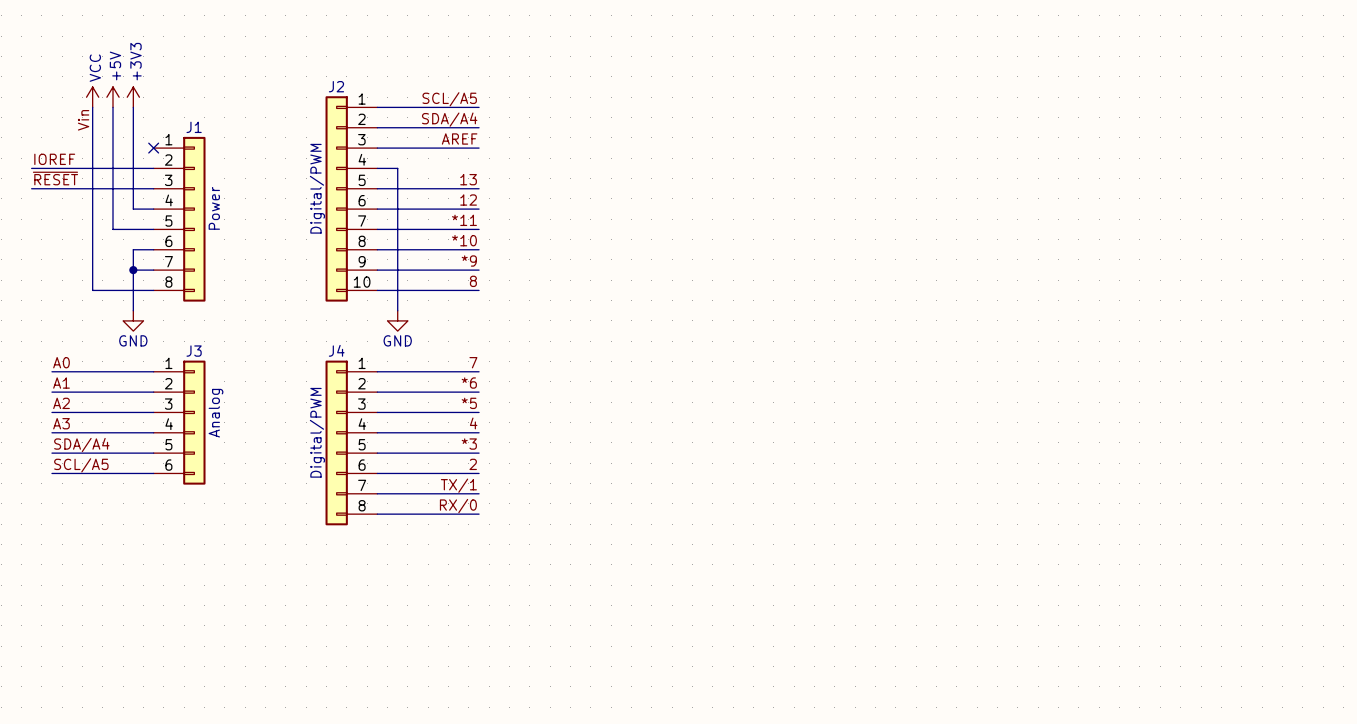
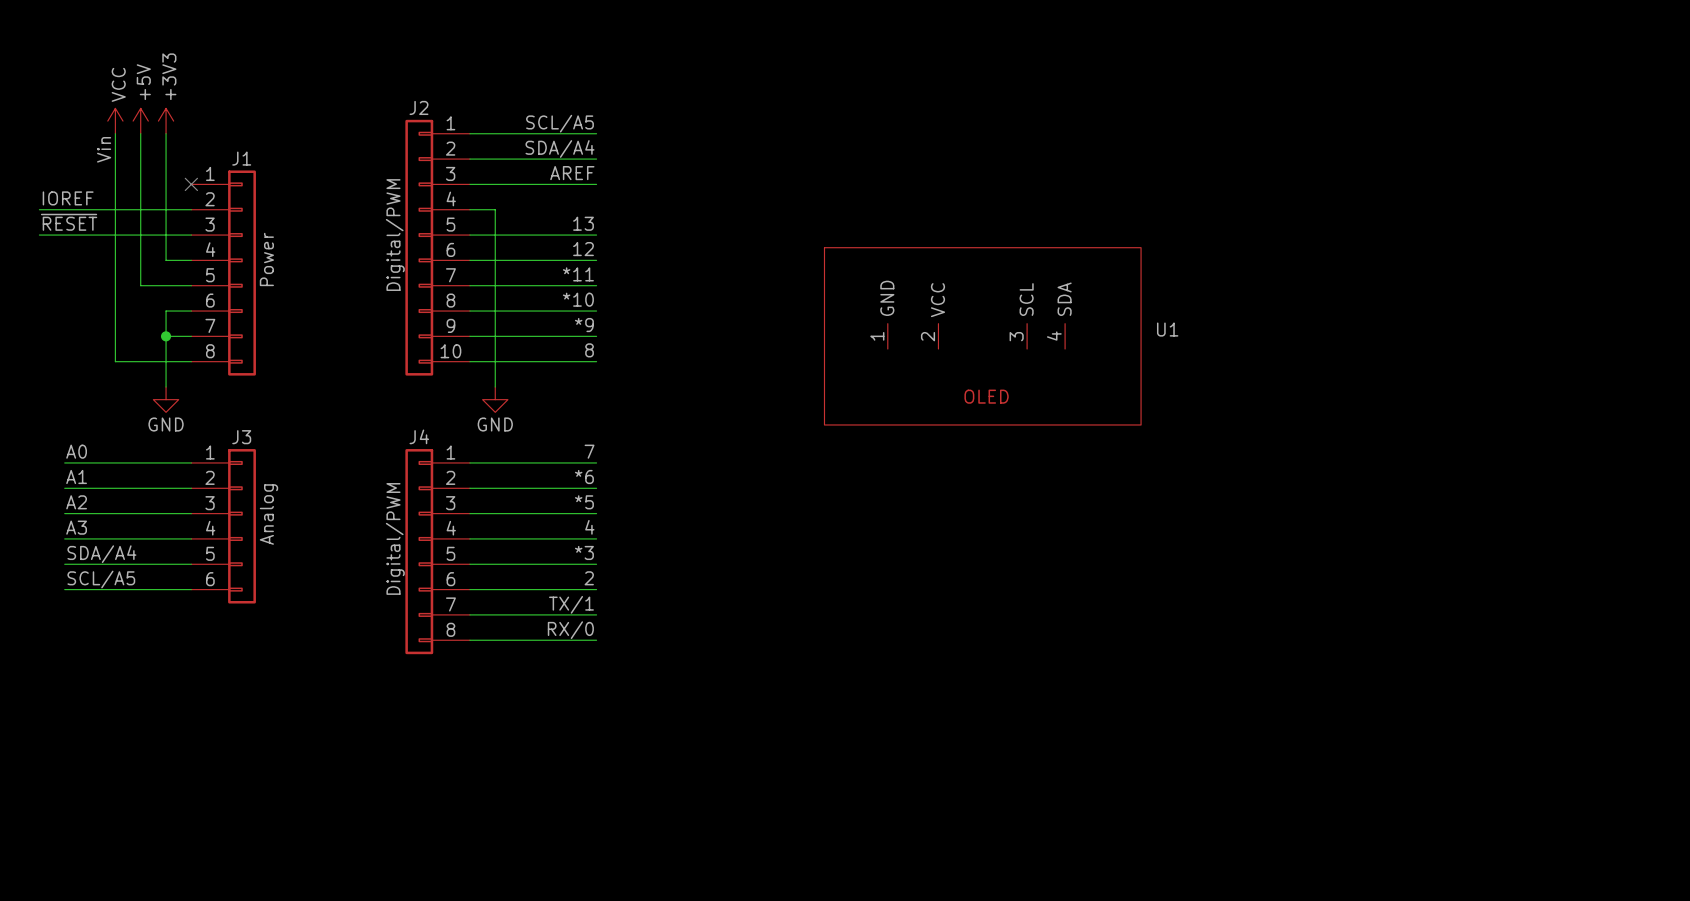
U1: none -> (982, 336)

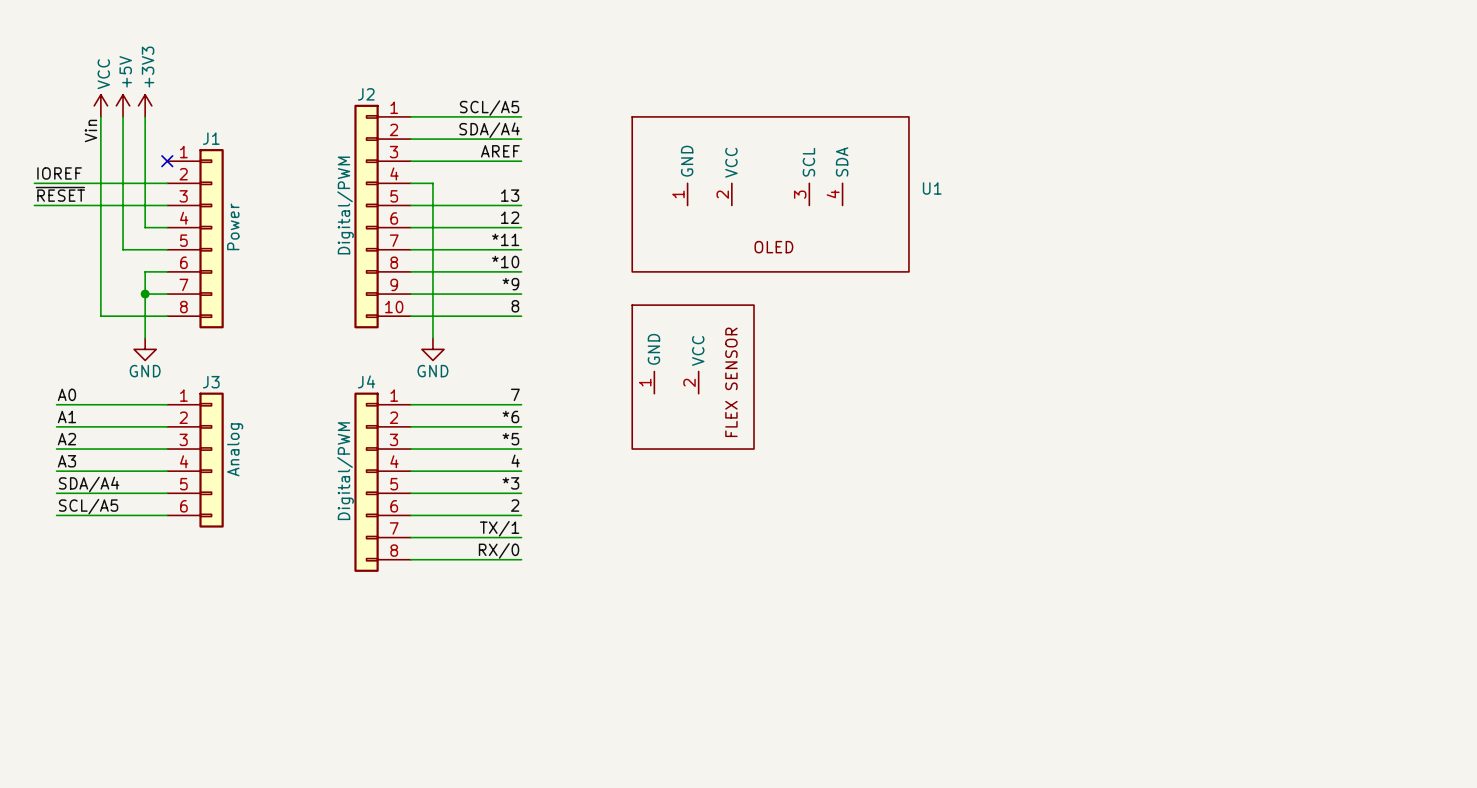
U1 position: (982, 336) -> (770, 194)
part: none -> (693, 377)

